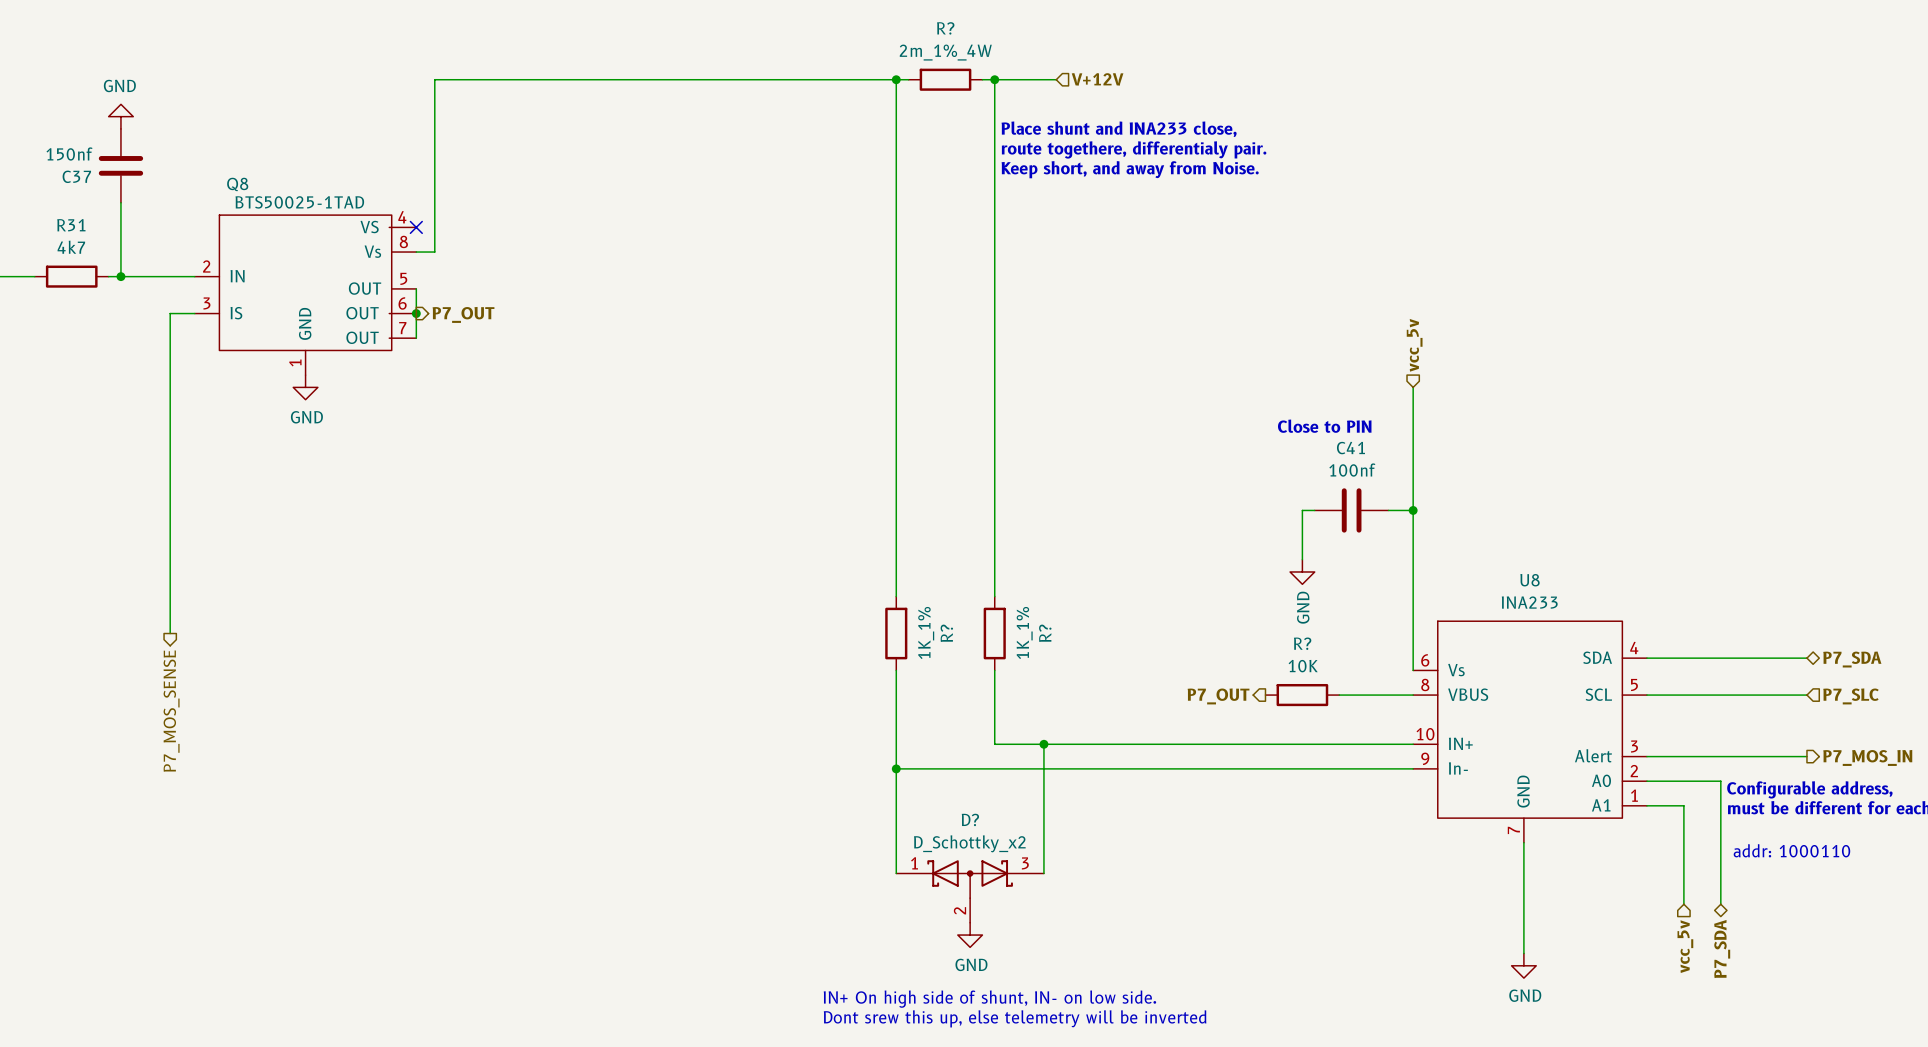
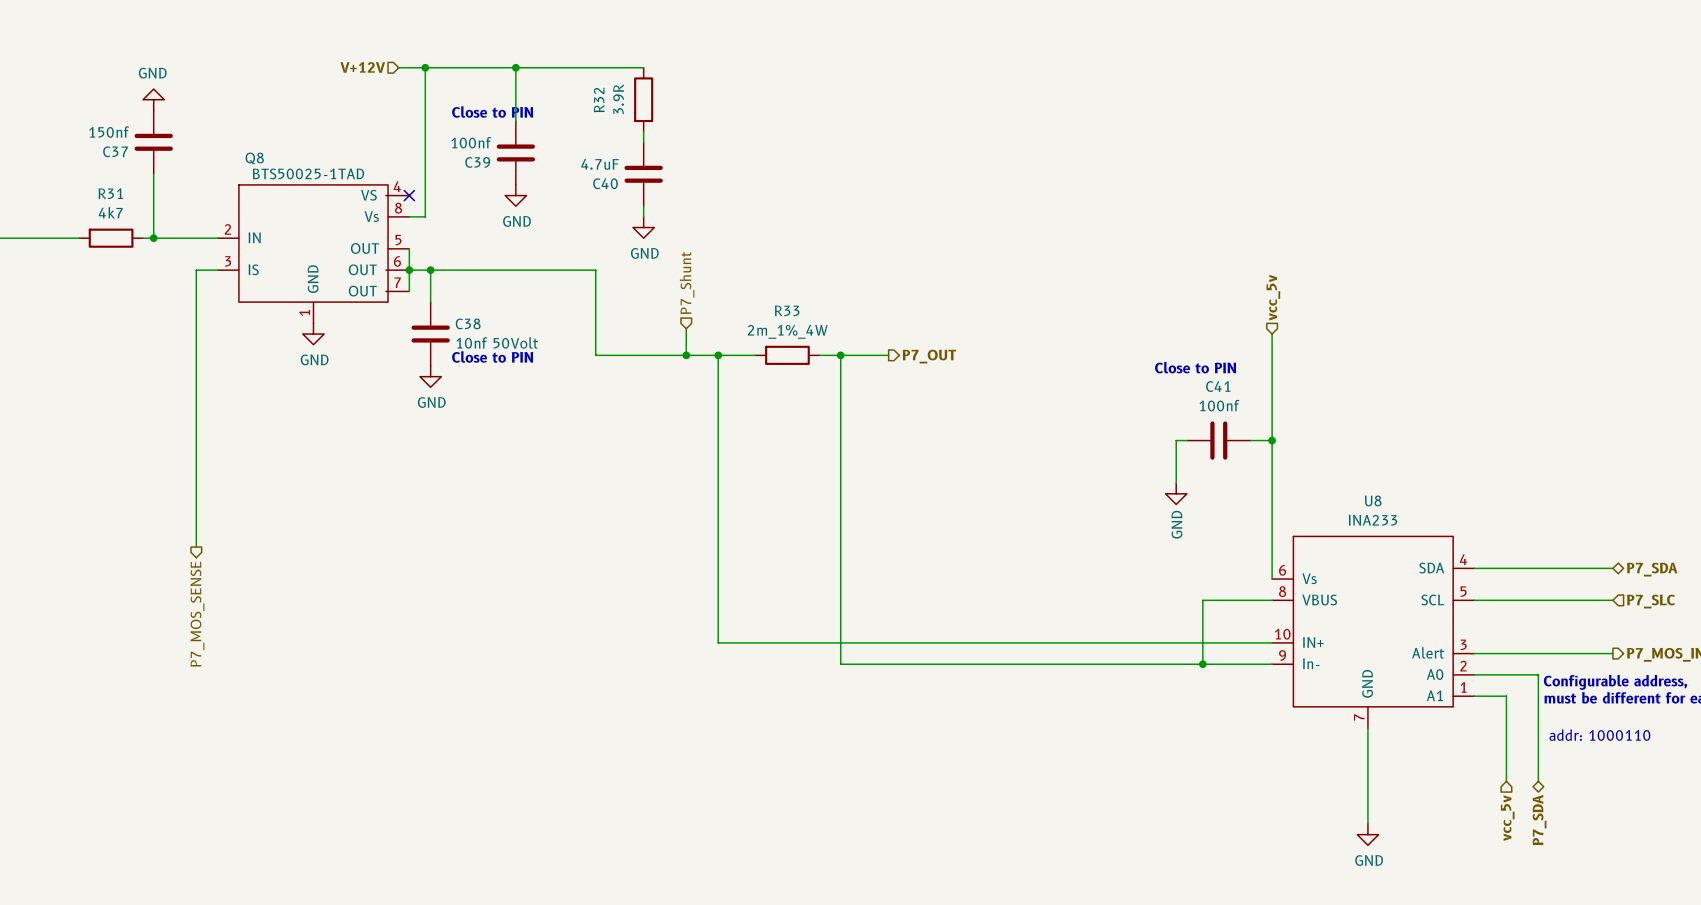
hierarchical label: none -> V+12V (362, 67)
wire: none -> (398, 67) (425, 67)
junction: none -> (425, 67)
wire: none -> (515, 67) (515, 121)
junction: none -> (515, 67)
wire: (687, 79) (908, 79) -> none
wire: (896, 79) (896, 596) -> none
junction: (896, 79) -> none
R?: 2m_1%_4W (945, 79) -> none
wire: (982, 79) (1056, 79) -> none
wire: (994, 79) (994, 596) -> none
junction: (994, 79) -> none
hierarchical label: V+12V (1097, 79) -> none
R32: none -> 3.9R (643, 99)
text: Place shunt and INA233 close, (1119, 129) -> none
text: none -> Close to PIN (492, 111)
text: route togethere, differentialy pair. (1134, 149) -> none
wire: none -> (643, 131) (643, 142)
text: Keep short, and away from Noise. (1130, 169) -> none
C39: none -> 100nf (515, 152)
C40: none -> 4.7uF (643, 174)
power symbol: none -> GND (515, 195)
wire: none -> (643, 206) (643, 216)
power symbol: none -> GND (643, 227)
wire: none -> (409, 270) (595, 270) (595, 355) (755, 355)
wire: none -> (430, 270) (430, 302)
junction: none -> (430, 270)
hierarchical label: P7_OUT (463, 314) -> none
hierarchical label: none -> P7_Shunt (687, 283)
wire: none -> (686, 328) (686, 355)
C38: none -> 10nf 50Volt (430, 334)
junction: none -> (686, 355)
junction: none -> (718, 355)
R33: none -> 2m_1%_4W (787, 355)
wire: none -> (819, 355) (888, 355)
junction: none -> (840, 355)
text: none -> Close to PIN (492, 356)
hierarchical label: none -> P7_OUT (929, 356)
power symbol: none -> GND (430, 376)
R?: 1K_1% (896, 633) -> none
R?: 1K_1% (994, 633) -> none
wire: (896, 670) (896, 873) -> none
wire: (994, 670) (994, 744) -> (718, 355) (718, 642) (909, 642)
R?: 10K (1302, 695) -> none
wire: none -> (1208, 600) (1202, 600) (1202, 664)
hierarchical label: P7_OUT (1218, 696) -> none
wire: (1043, 744) (1043, 873) -> none
junction: (1043, 744) -> none
wire: (896, 768) (914, 768) -> (840, 355) (840, 664)
junction: (896, 768) -> none
junction: none -> (1202, 664)
D?: D_Schottky_x2 (970, 891) -> none
power symbol: GND (970, 935) -> none
text: IN+ On high side of shunt, IN- on low side. (989, 999) -> none
text: Dont srew this up, else telemetry will be inverted (1015, 1018) -> none

